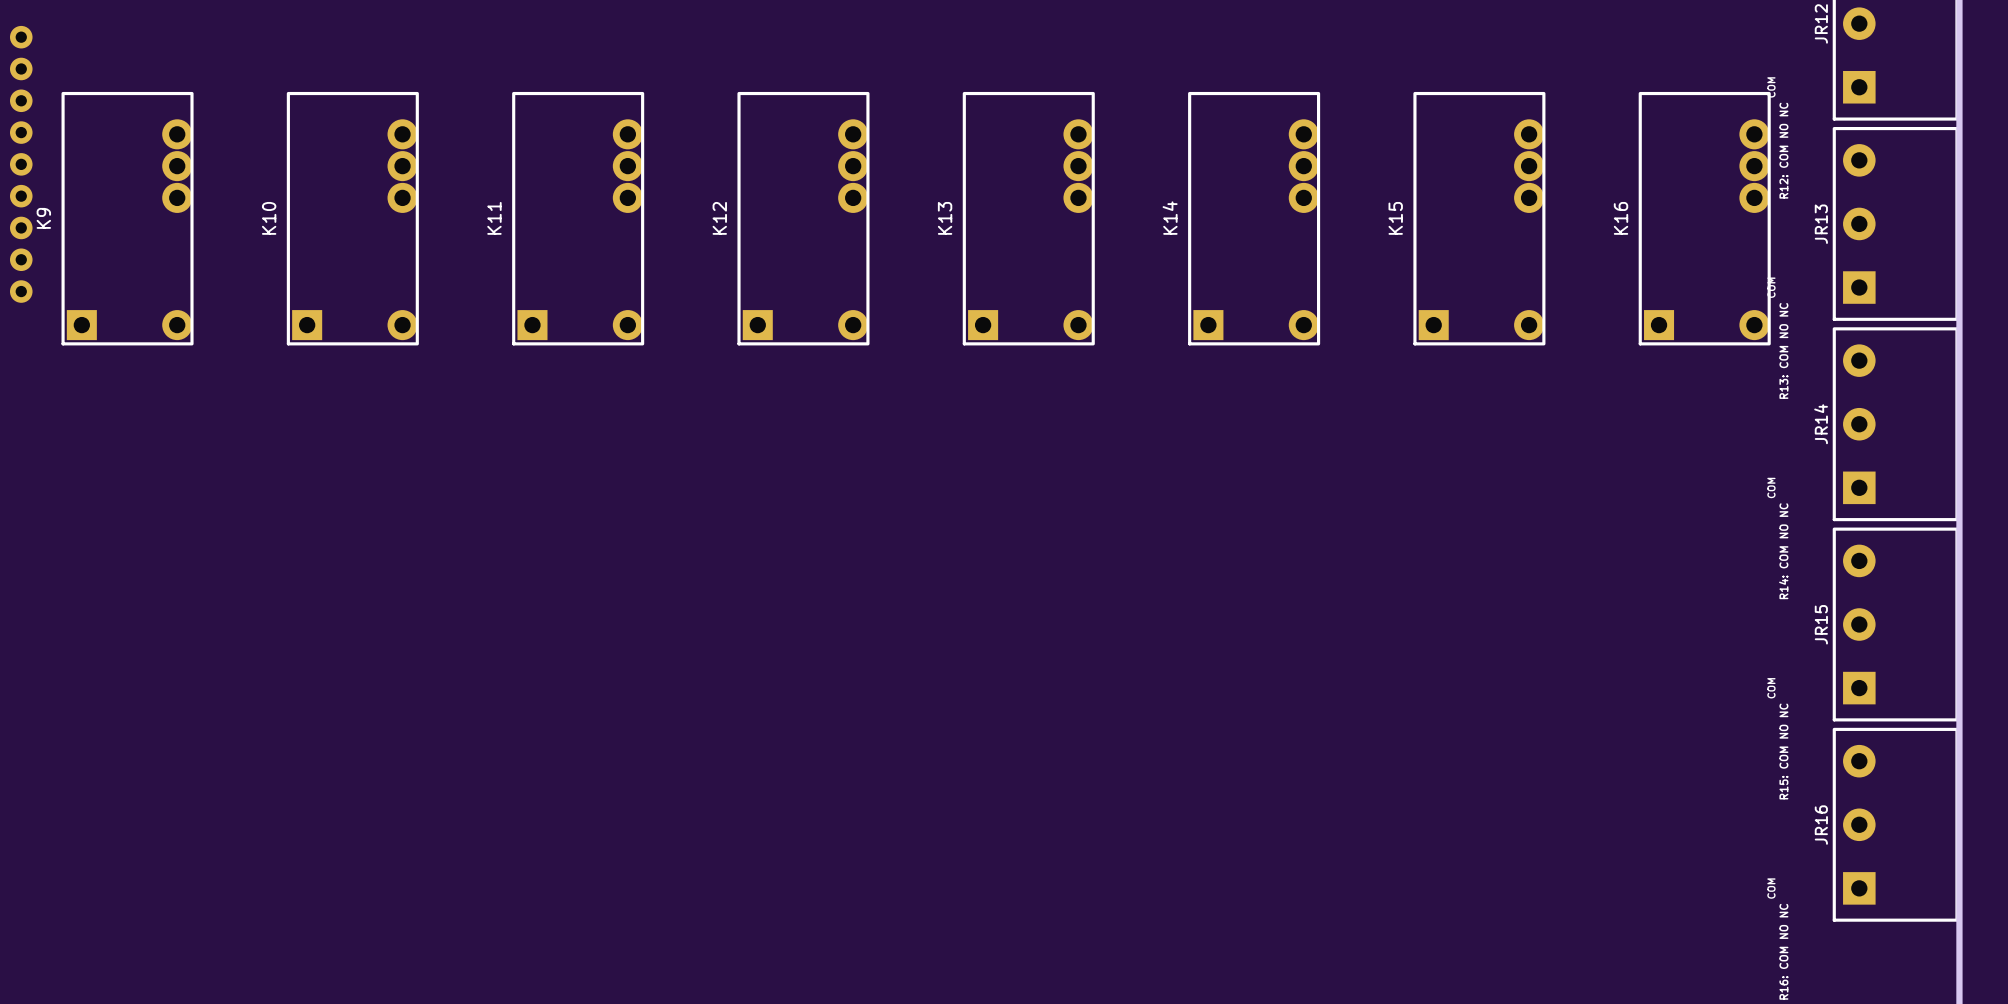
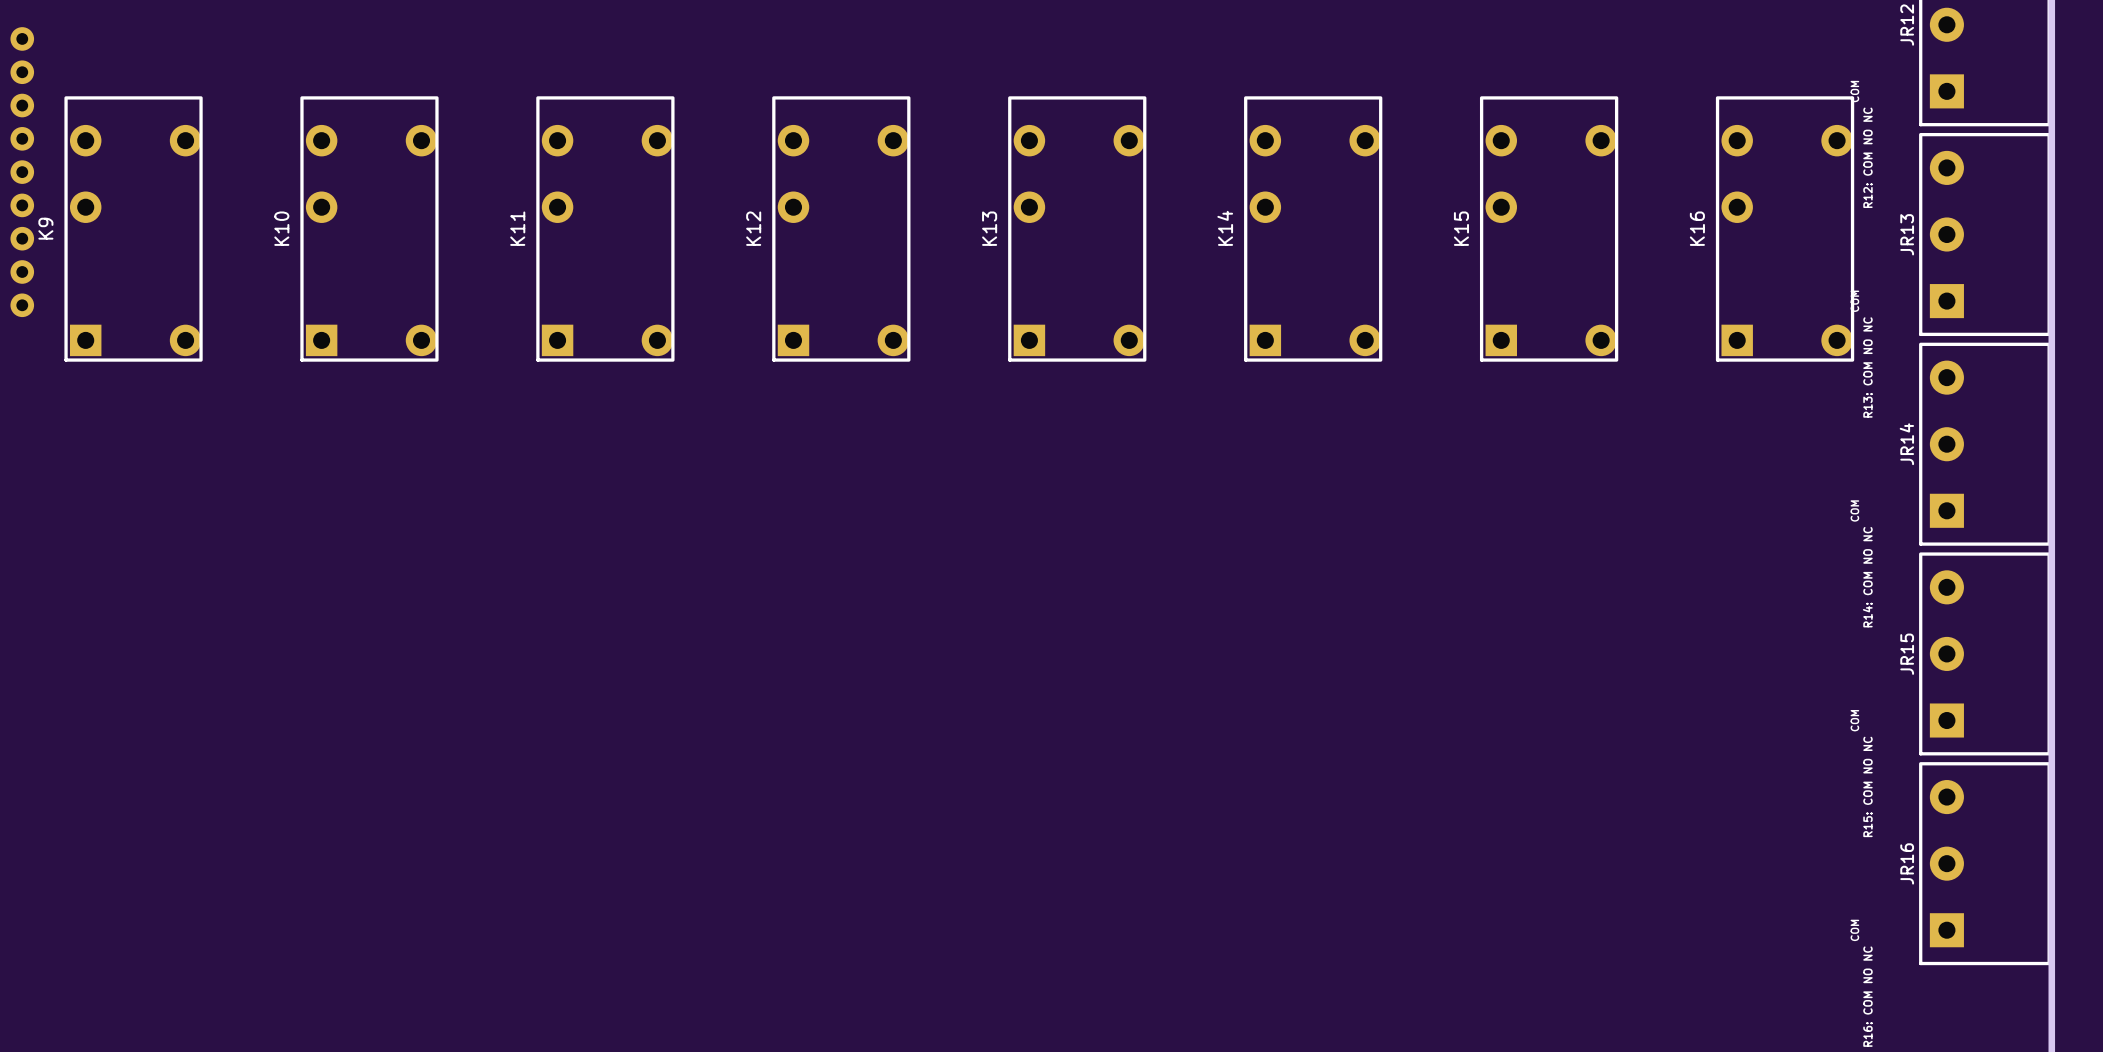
K9 footprint: [61, 91, 194, 346] -> [64, 96, 203, 362]
K10 footprint: [286, 91, 419, 346] -> [300, 96, 439, 362]
K11 footprint: [512, 91, 645, 346] -> [536, 96, 675, 362]
K12 footprint: [737, 91, 870, 346] -> [772, 96, 911, 362]
K13 footprint: [962, 91, 1095, 346] -> [1008, 96, 1147, 362]
K14 footprint: [1188, 91, 1321, 346] -> [1244, 96, 1383, 362]
K15 footprint: [1413, 91, 1546, 346] -> [1479, 96, 1619, 362]
K16 footprint: [1638, 91, 1771, 346] -> [1715, 96, 1855, 362]

